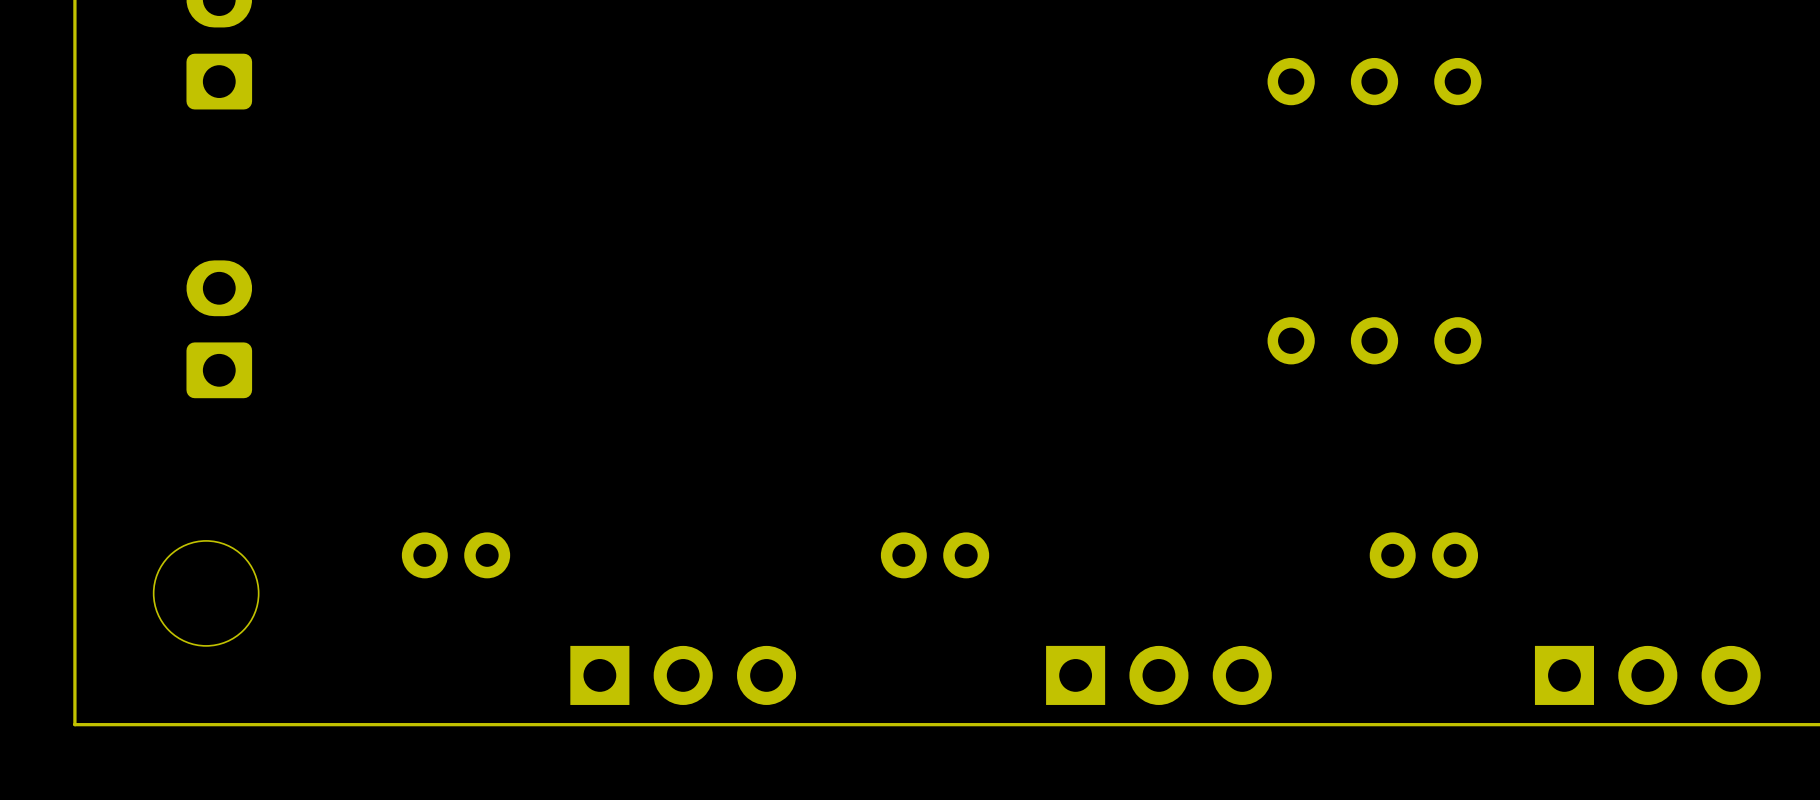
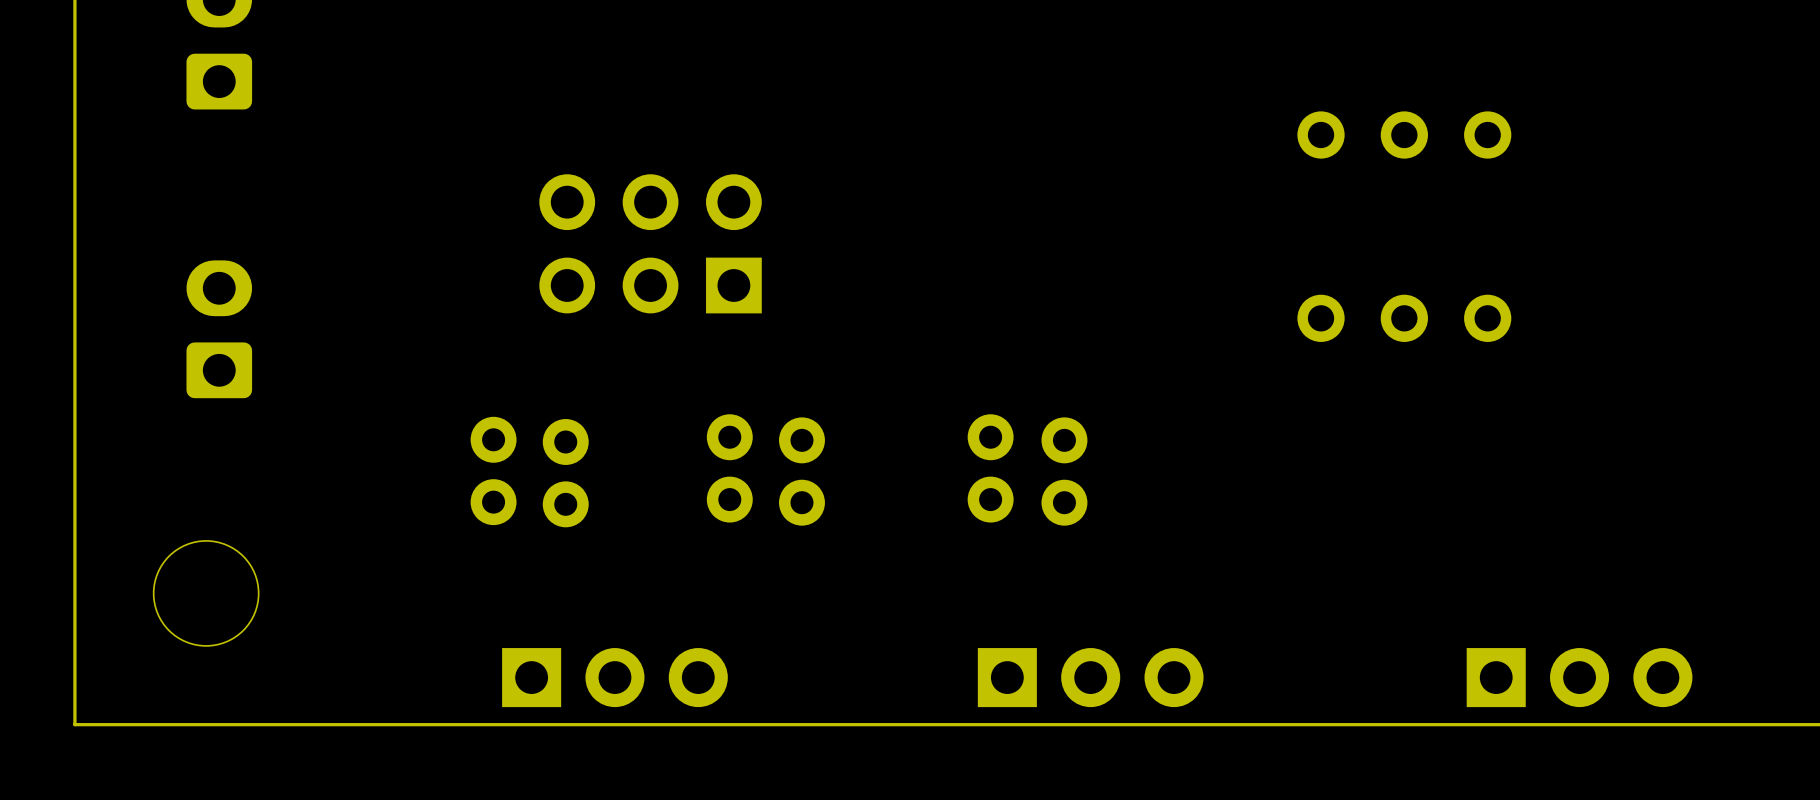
part position: (1374, 81) -> (1404, 135)
part: none -> (650, 243)
part position: (1374, 340) -> (1404, 318)
part: none -> (729, 468)
part: none -> (990, 468)
part: none -> (493, 470)
part: none -> (801, 471)
part: none -> (1064, 471)
part: none -> (565, 473)
part: (456, 555) -> none
part: (935, 555) -> none
part: (1423, 555) -> none
part position: (683, 675) -> (614, 677)
part position: (1158, 675) -> (1090, 677)
part position: (1647, 675) -> (1579, 677)

